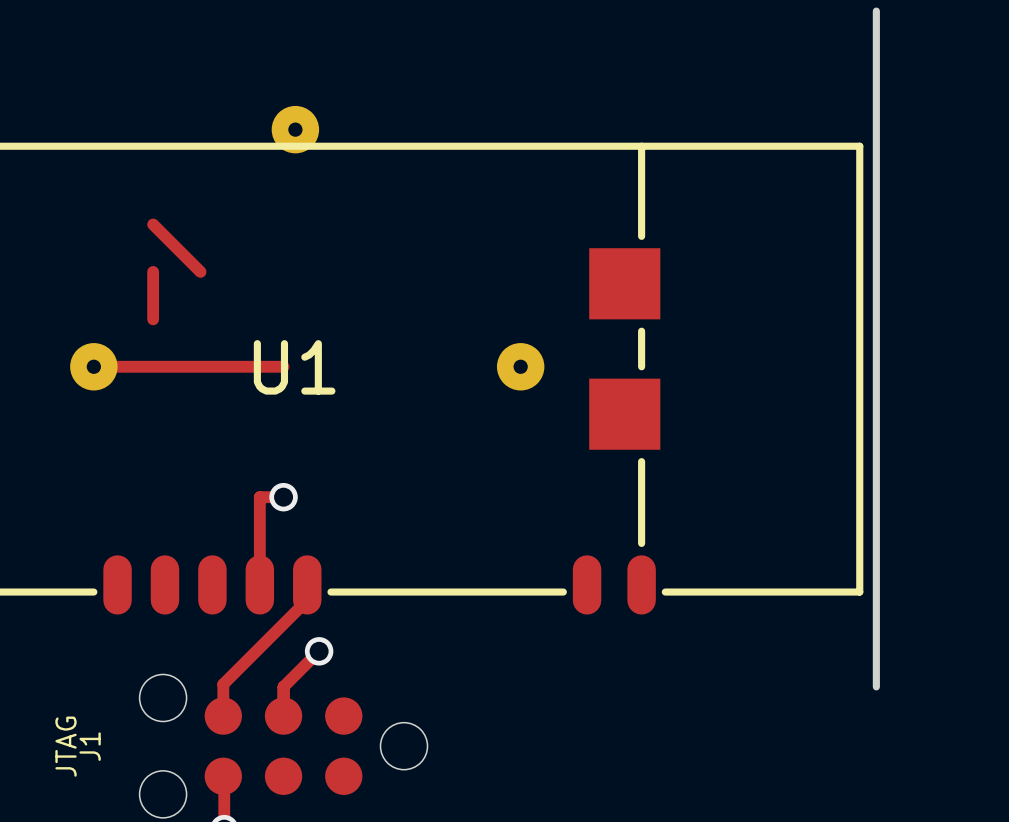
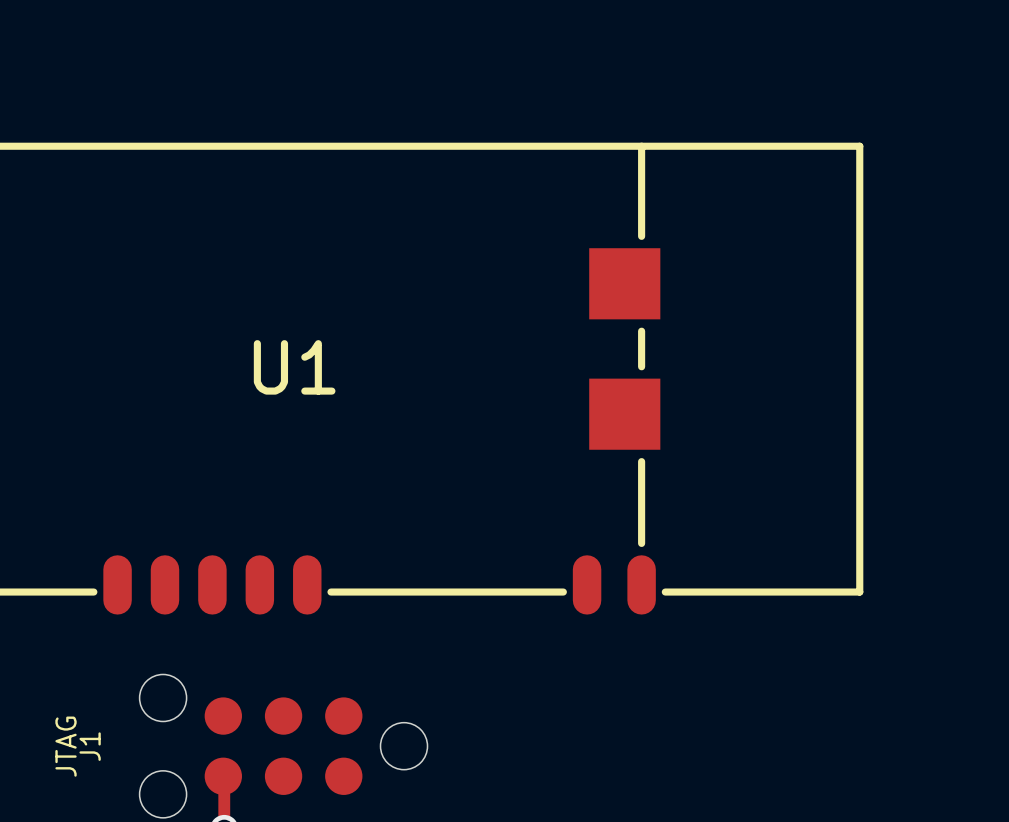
board edge: (876, 11) (876, 686) -> none
part: (295, 129) -> none
track: (153, 224) (200, 271) -> none
track: (153, 271) (153, 319) -> none
part: (93, 366) -> none
track: (105, 366) (283, 366) -> none
part: (520, 366) -> none
track: (283, 497) (259, 497) (259, 584) -> none
via: (283, 497) -> none
track: (307, 584) (307, 600) (223, 684) (223, 716) -> none
track: (319, 651) (283, 686) (283, 716) -> none
via: (319, 651) -> none

